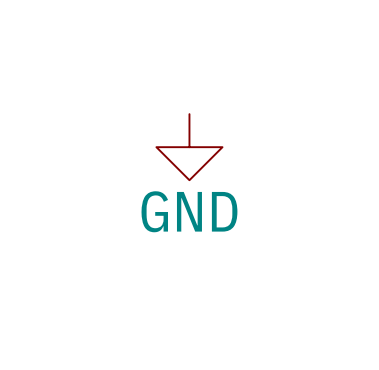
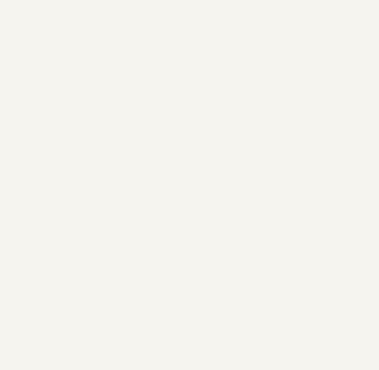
power symbol: GND (189, 147) -> none

